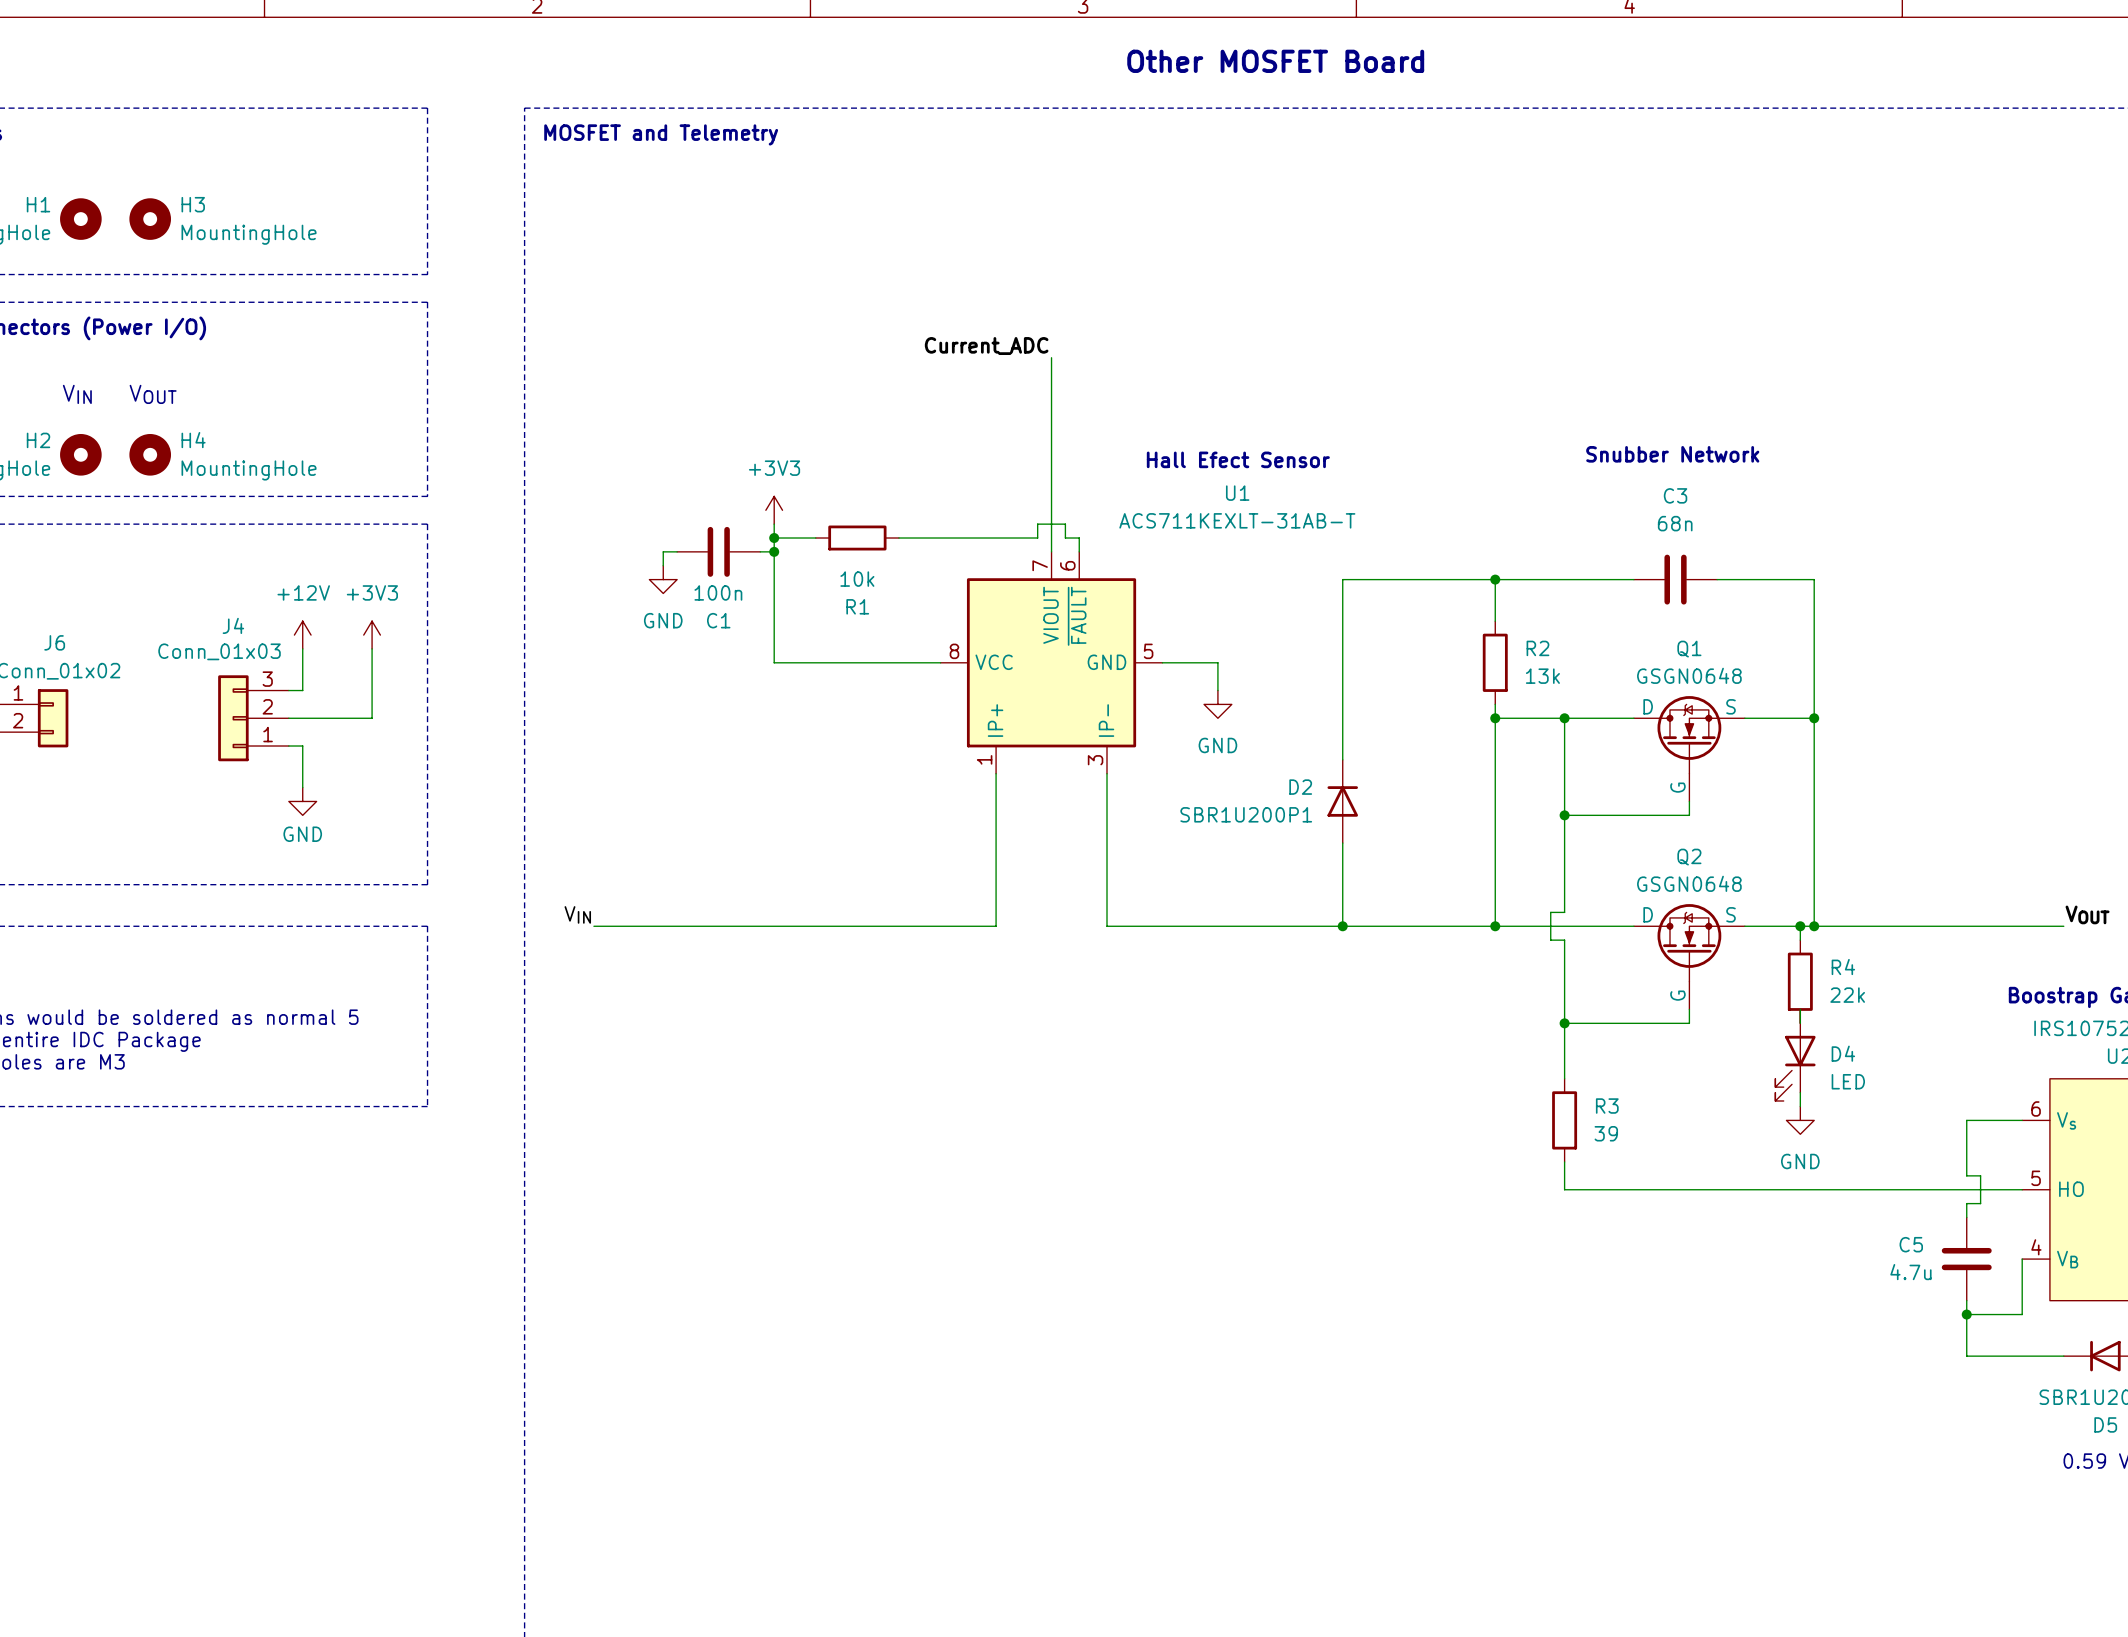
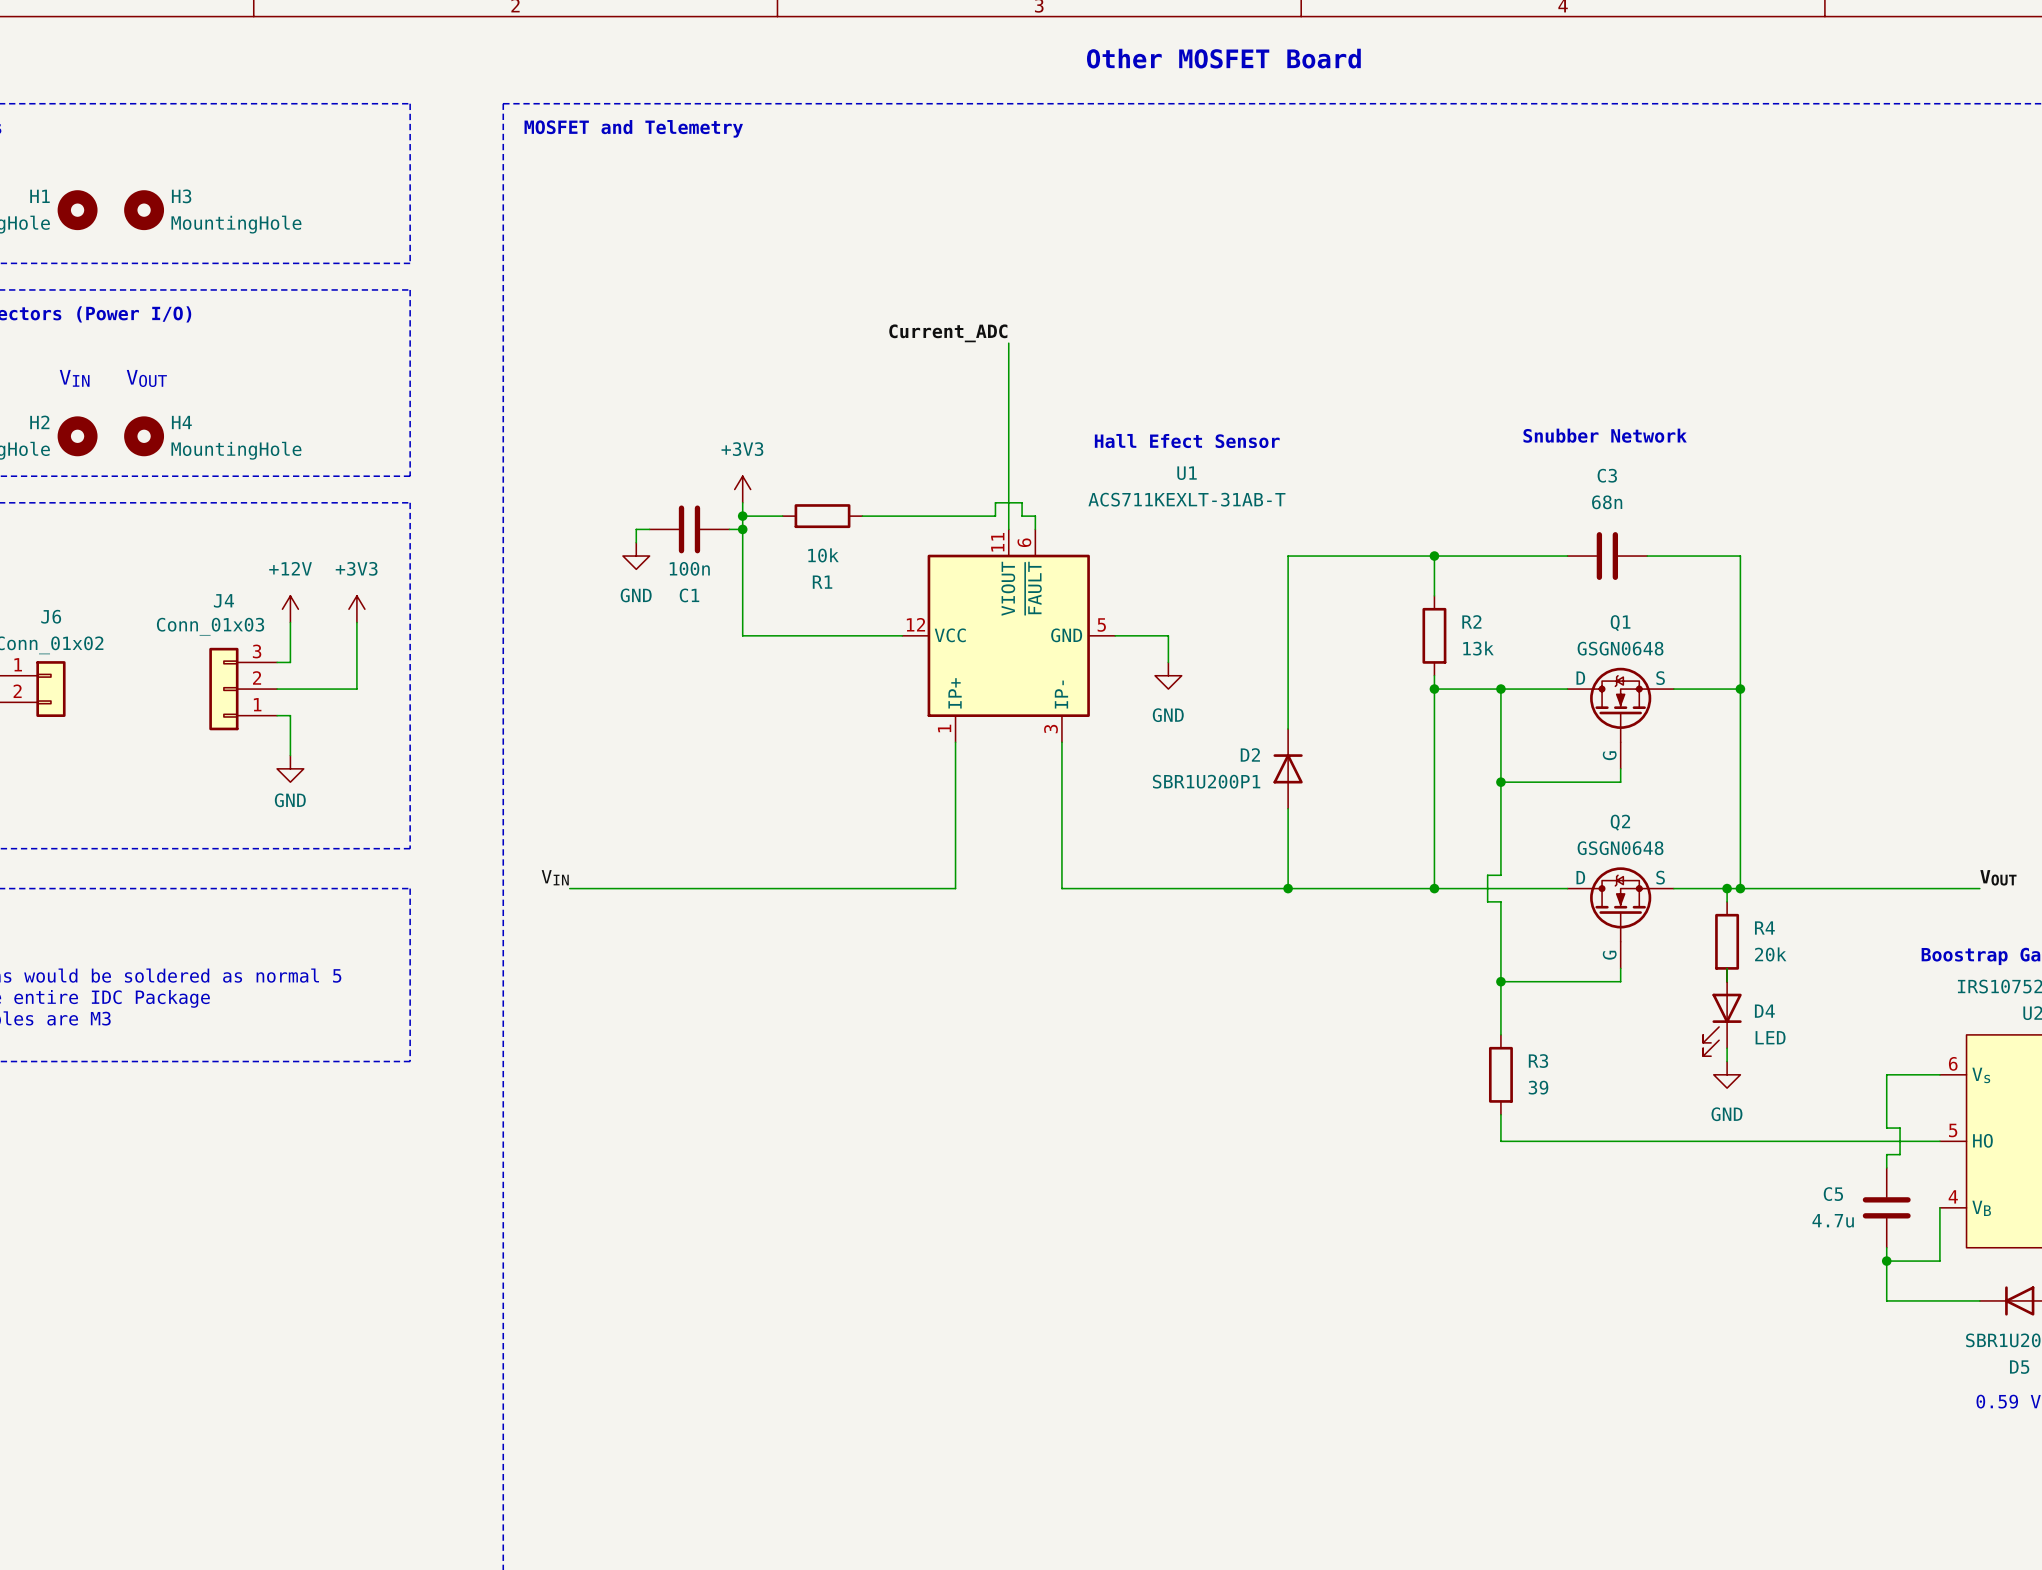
U1 pin number: 7 (1040, 565) -> 11 (997, 542)
U1 pin number: 8 (954, 651) -> 12 (915, 624)
R4 value: 22k (1847, 995) -> 20k (1770, 954)

